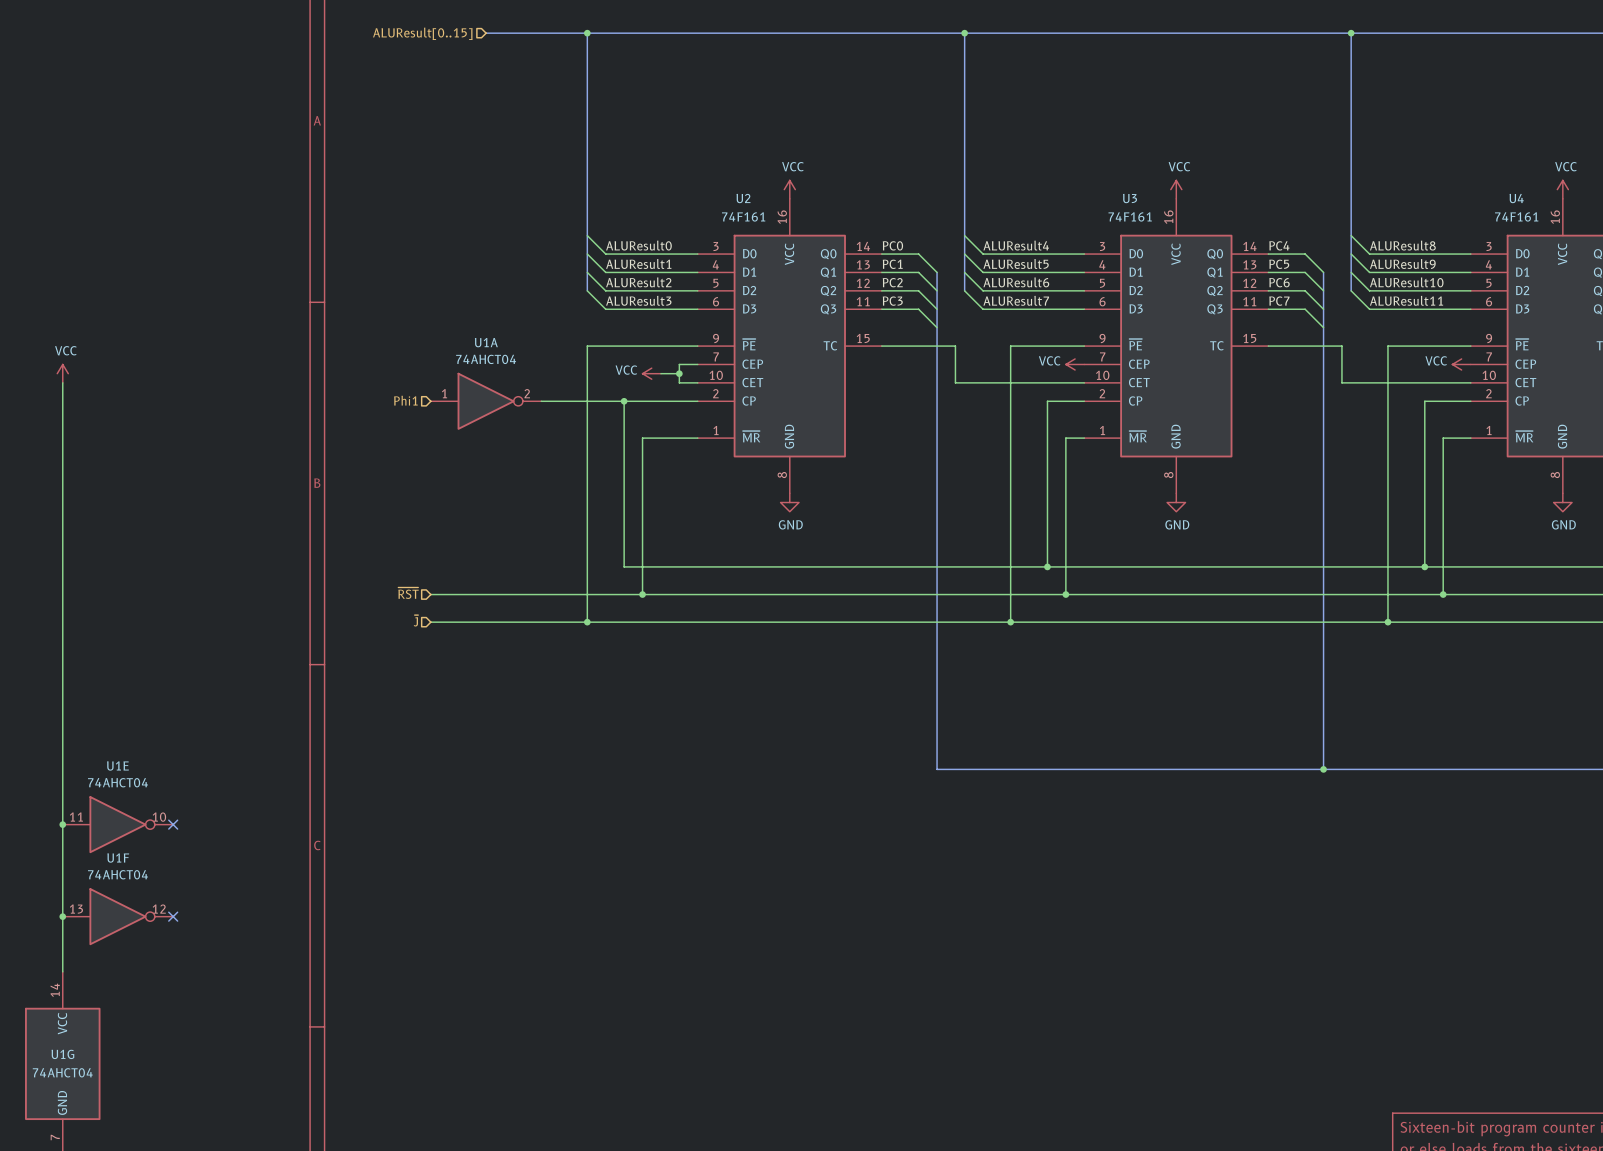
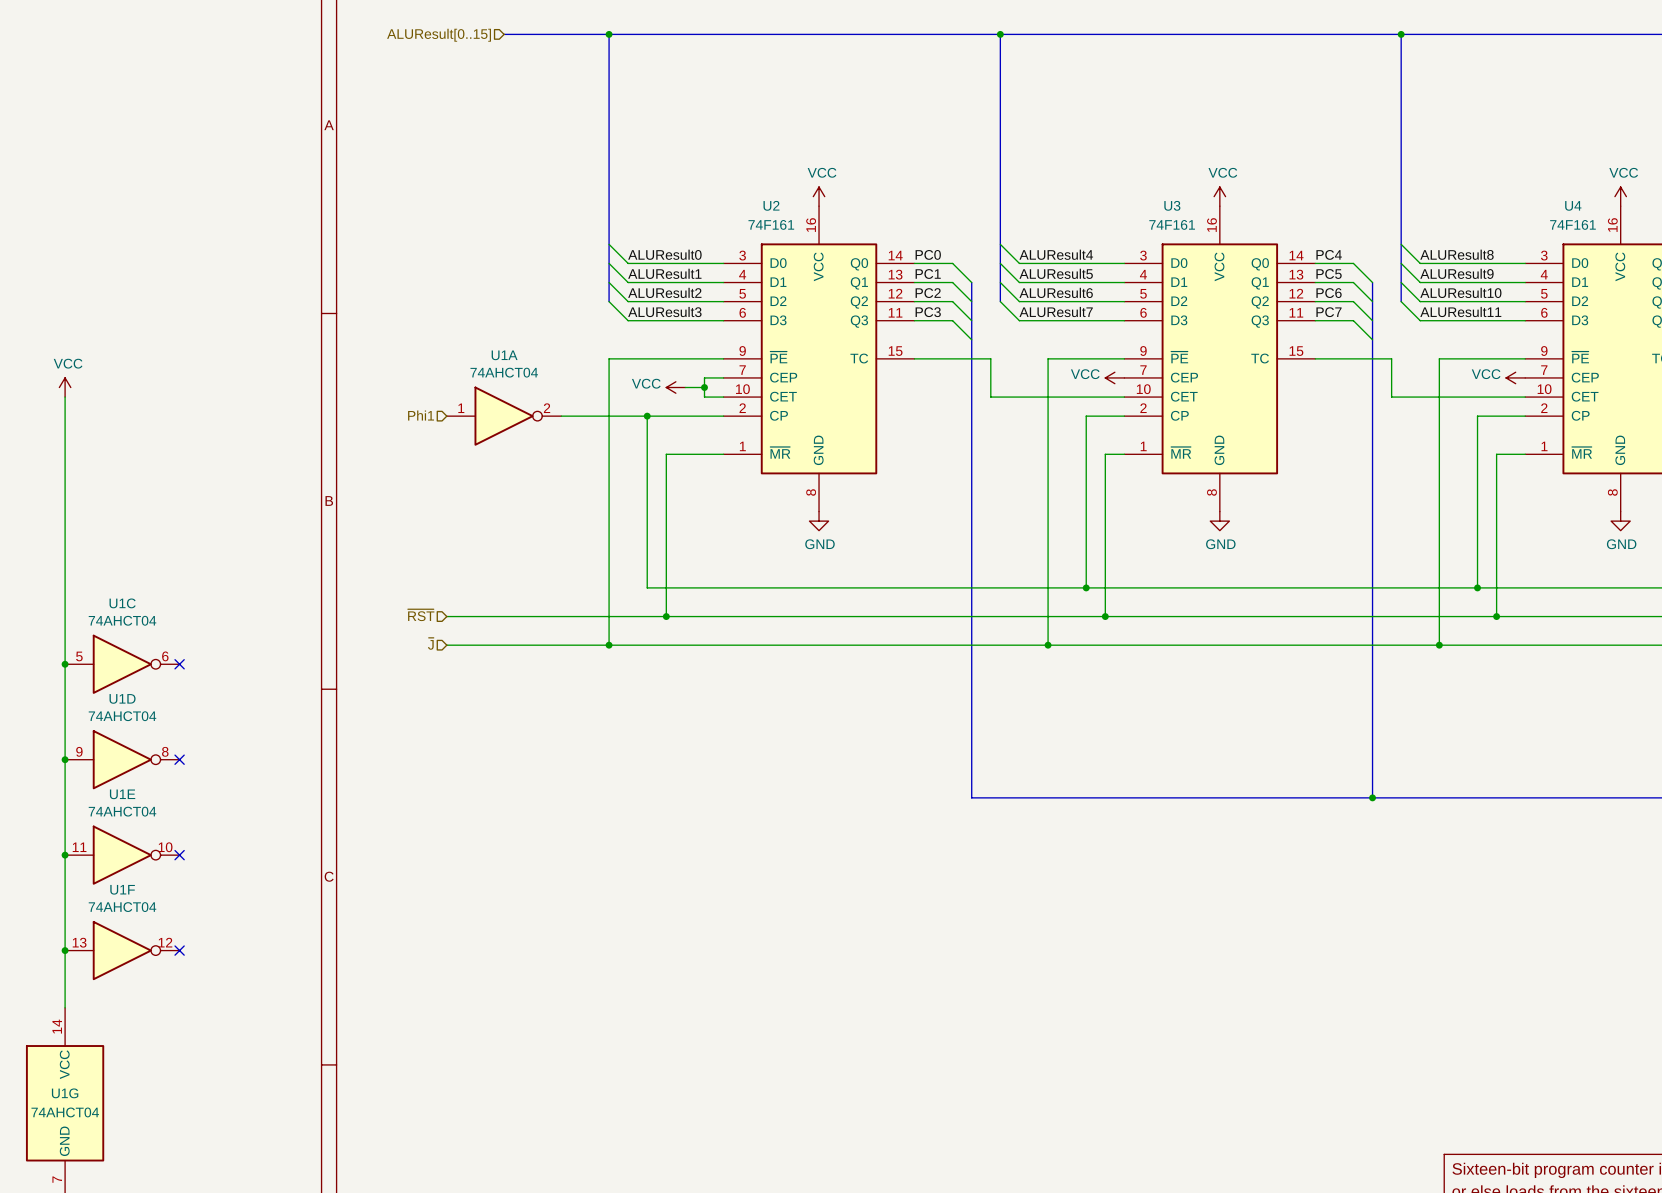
junction: none -> (65, 664)
U1C: none -> 74AHCT04 (122, 664)
no-connect mark: none -> (179, 664)
junction: none -> (65, 759)
U1D: none -> 74AHCT04 (122, 759)
no-connect mark: none -> (179, 759)

